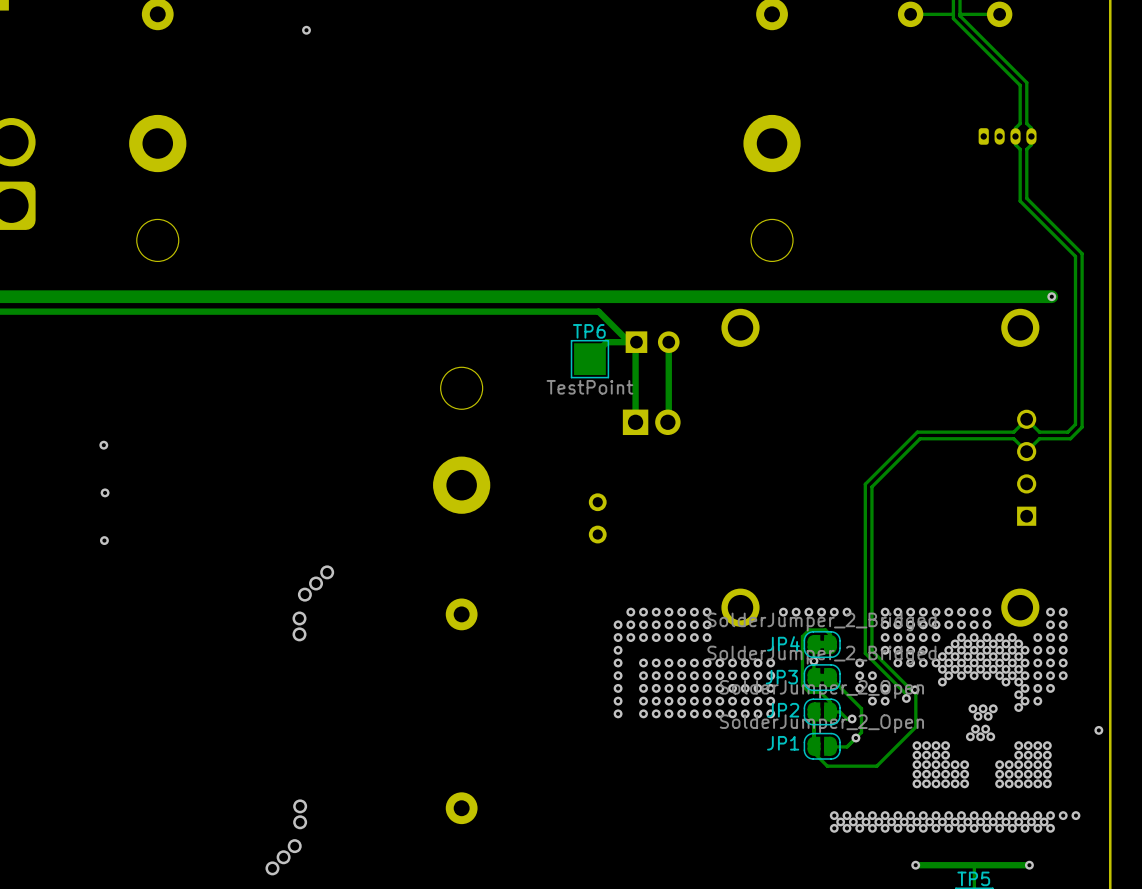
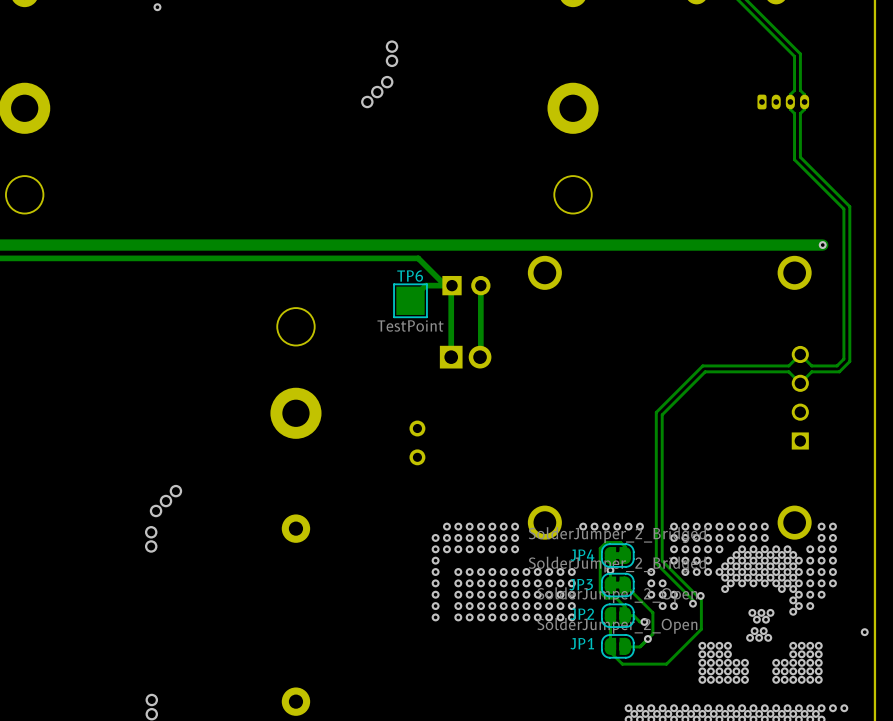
via: none -> (392, 46)
via: none -> (392, 60)
via: none -> (387, 82)
via: none -> (377, 92)
via: none -> (367, 102)

